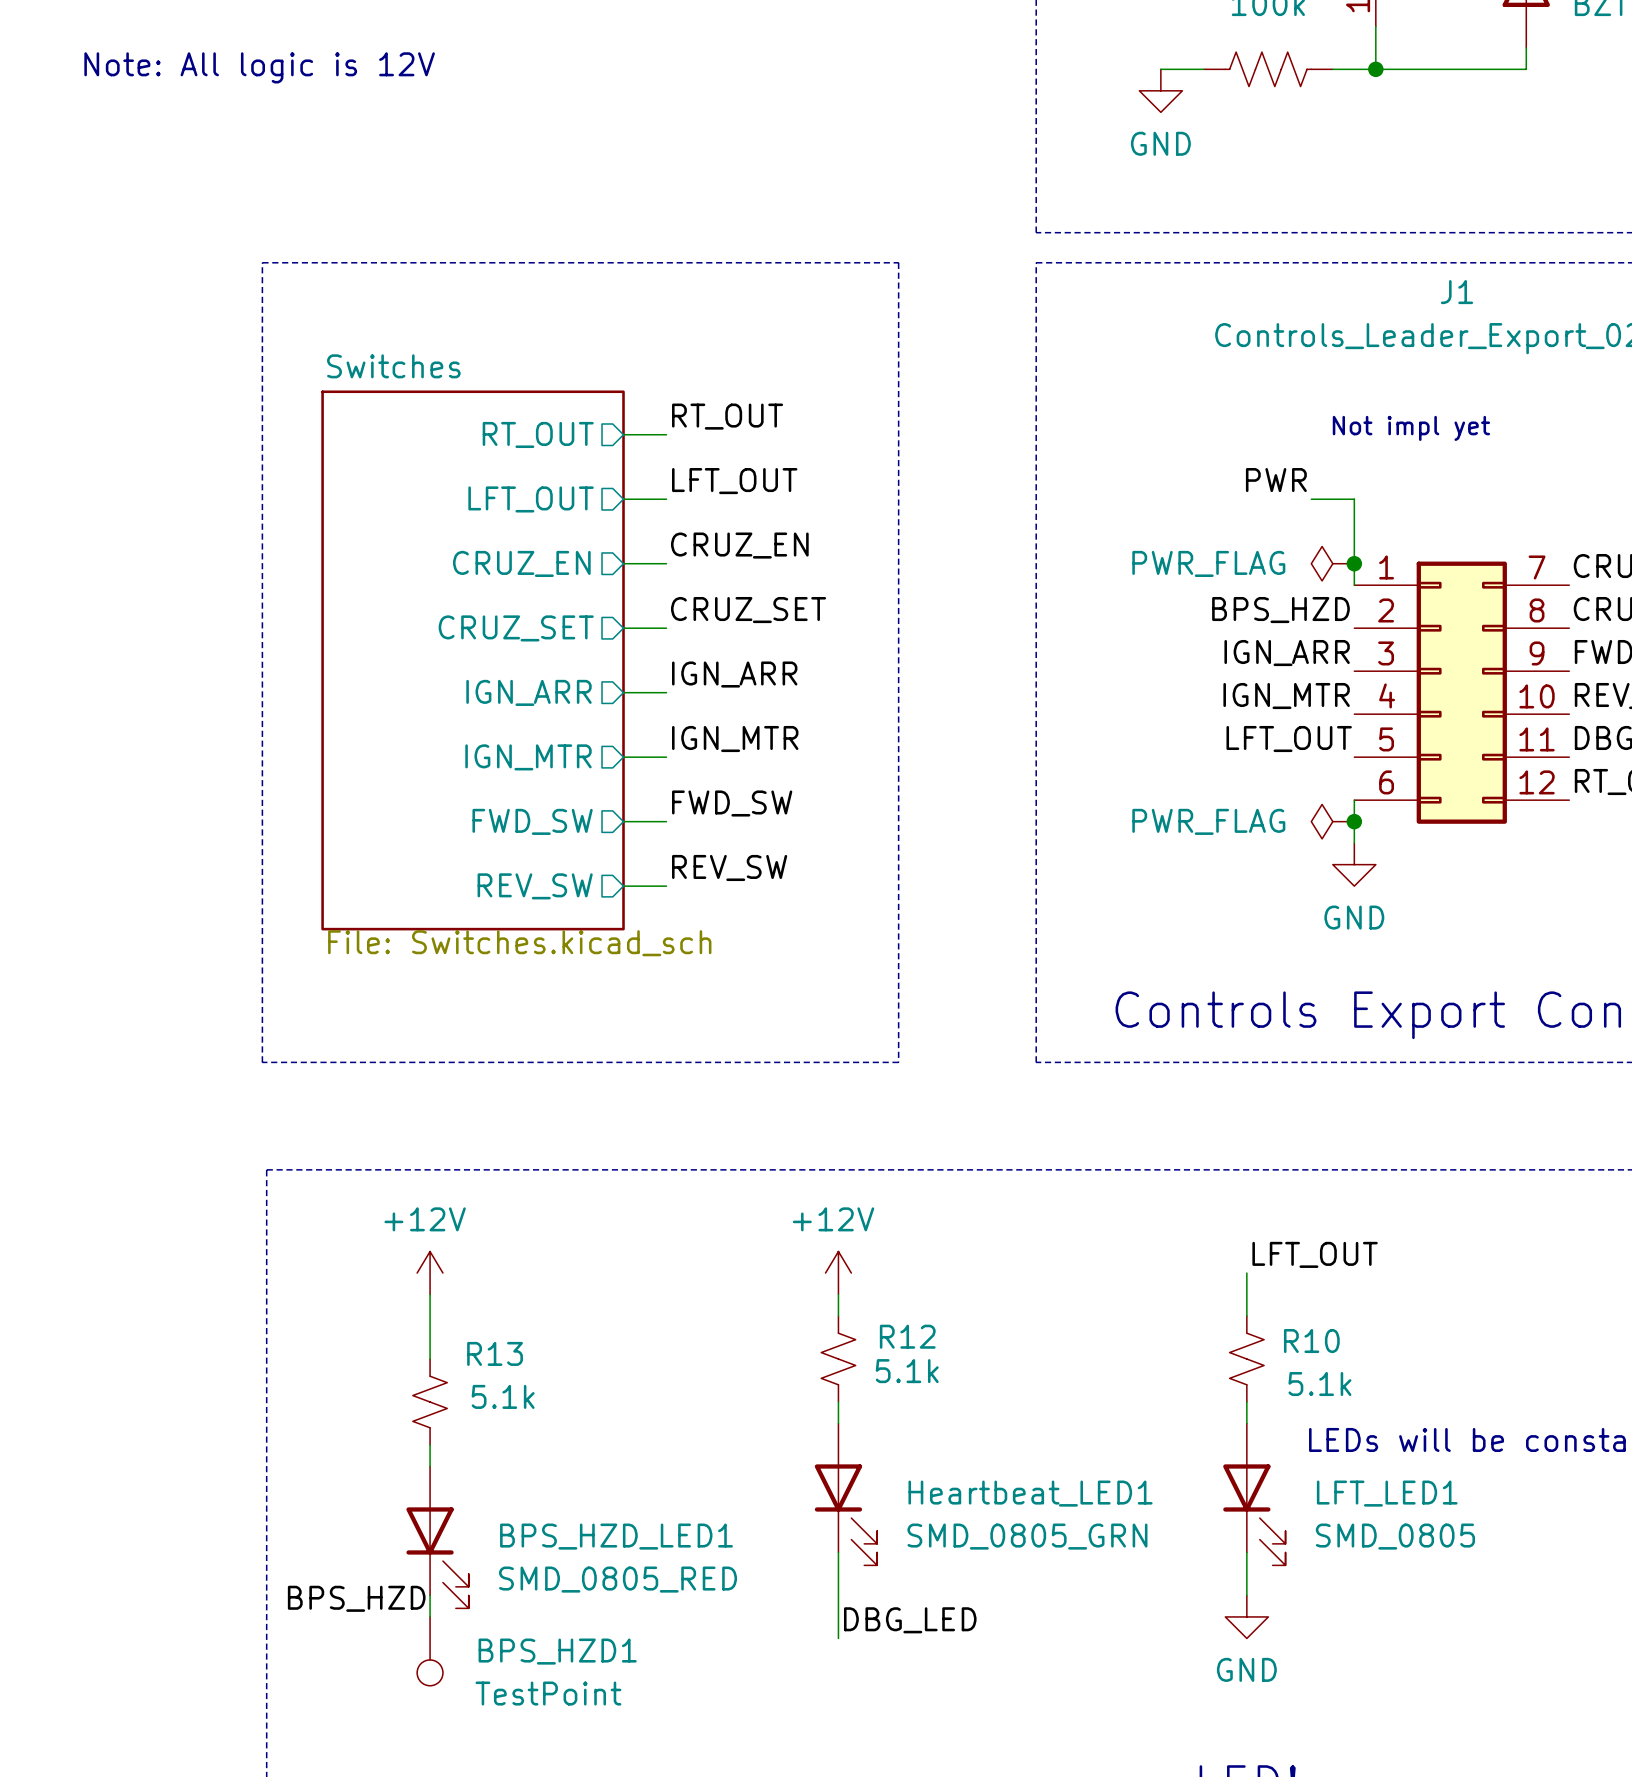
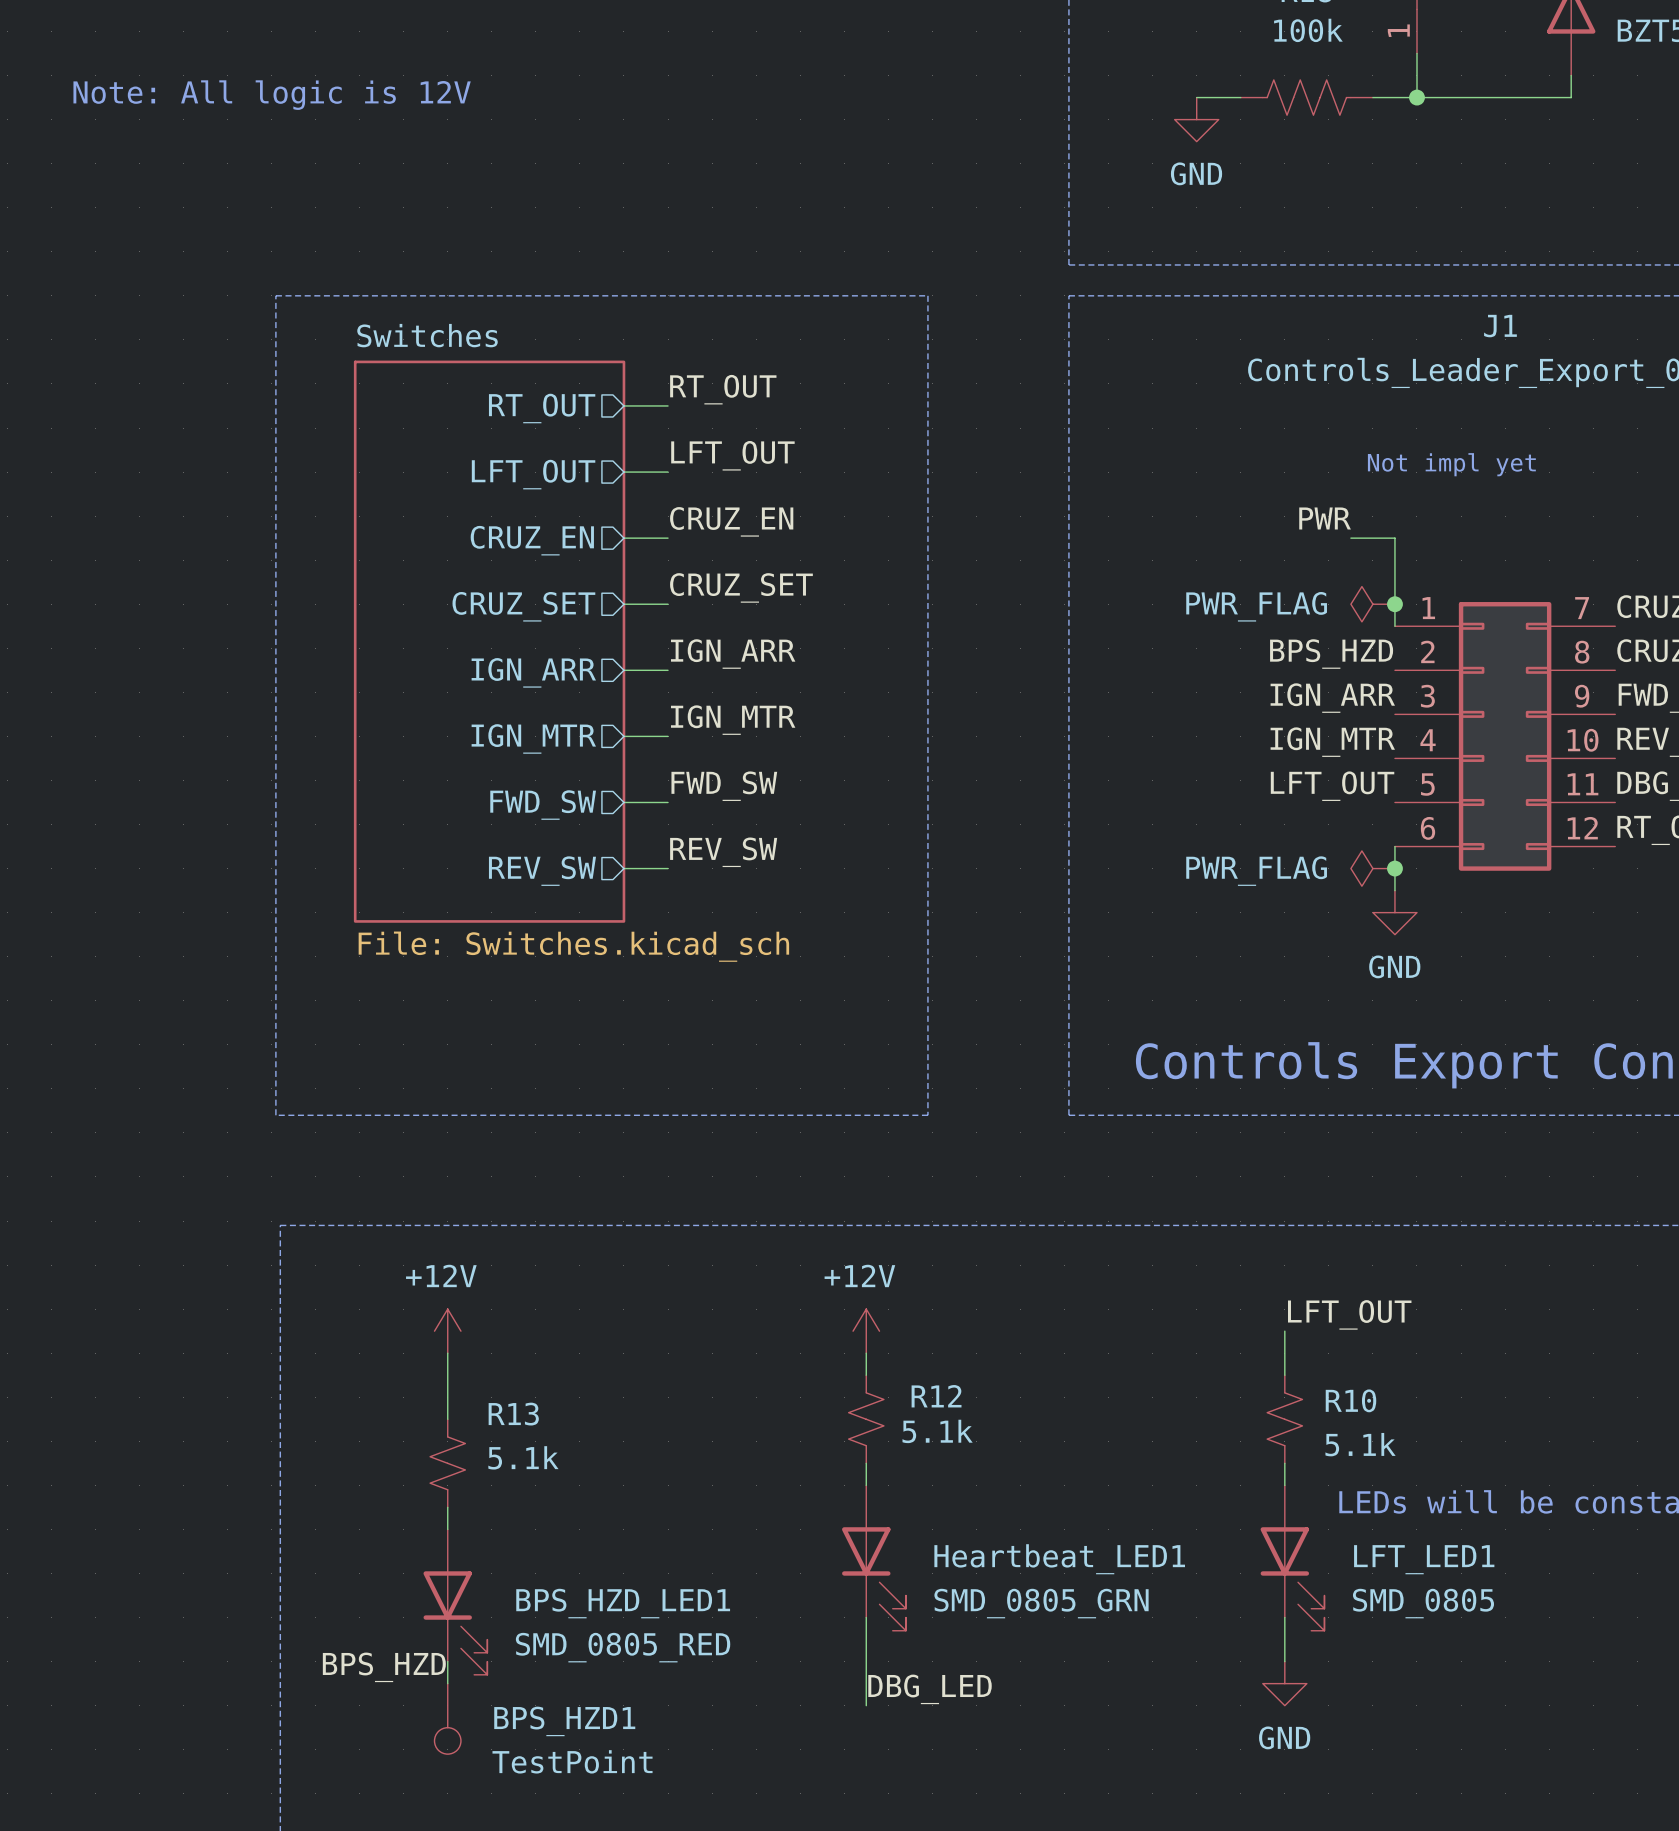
wire: none -> (623, 405) (668, 405)
label position: RT_OUT (727, 416) -> RT_OUT (723, 389)
sheet pin position: RT_OUT (538, 434) -> RT_OUT (542, 408)
wire: (645, 434) (666, 434) -> (623, 472) (645, 472)
label position: LFT_OUT (734, 481) -> LFT_OUT (732, 455)
sheet pin position: LFT_OUT (531, 499) -> LFT_OUT (533, 474)
wire: (645, 499) (666, 499) -> (623, 538) (645, 538)
label position: CRUZ_EN (739, 545) -> CRUZ_EN (731, 521)
sheet pin position: CRUZ_EN (521, 563) -> CRUZ_EN (532, 540)
wire: (645, 563) (666, 563) -> (623, 604) (645, 604)
sheet Switches: none -> File: Switches.kicad_sch (489, 641)
label position: CRUZ_SET (748, 610) -> CRUZ_SET (741, 587)
sheet pin position: CRUZ_SET (516, 628) -> CRUZ_SET (523, 606)
wire: (645, 628) (666, 628) -> (623, 670) (645, 670)
sheet Switches: File: Switches.kicad_sch (473, 660) -> none
label position: IGN_ARR (734, 674) -> IGN_ARR (733, 654)
sheet pin position: IGN_ARR (529, 692) -> IGN_ARR (533, 672)
wire: (645, 692) (666, 692) -> (623, 736) (645, 736)
label position: IGN_MTR (735, 739) -> IGN_MTR (733, 720)
sheet pin position: IGN_MTR (528, 757) -> IGN_MTR (533, 738)
wire: (645, 757) (666, 757) -> (623, 802) (645, 802)
label position: FWD_SW (732, 803) -> FWD_SW (724, 786)
sheet pin position: FWD_SW (532, 821) -> FWD_SW (543, 805)
wire: (645, 821) (666, 821) -> (623, 868) (645, 868)
label position: REV_SW (729, 867) -> REV_SW (723, 852)
sheet pin position: REV_SW (535, 886) -> REV_SW (542, 871)
wire: (623, 886) (666, 886) -> none

